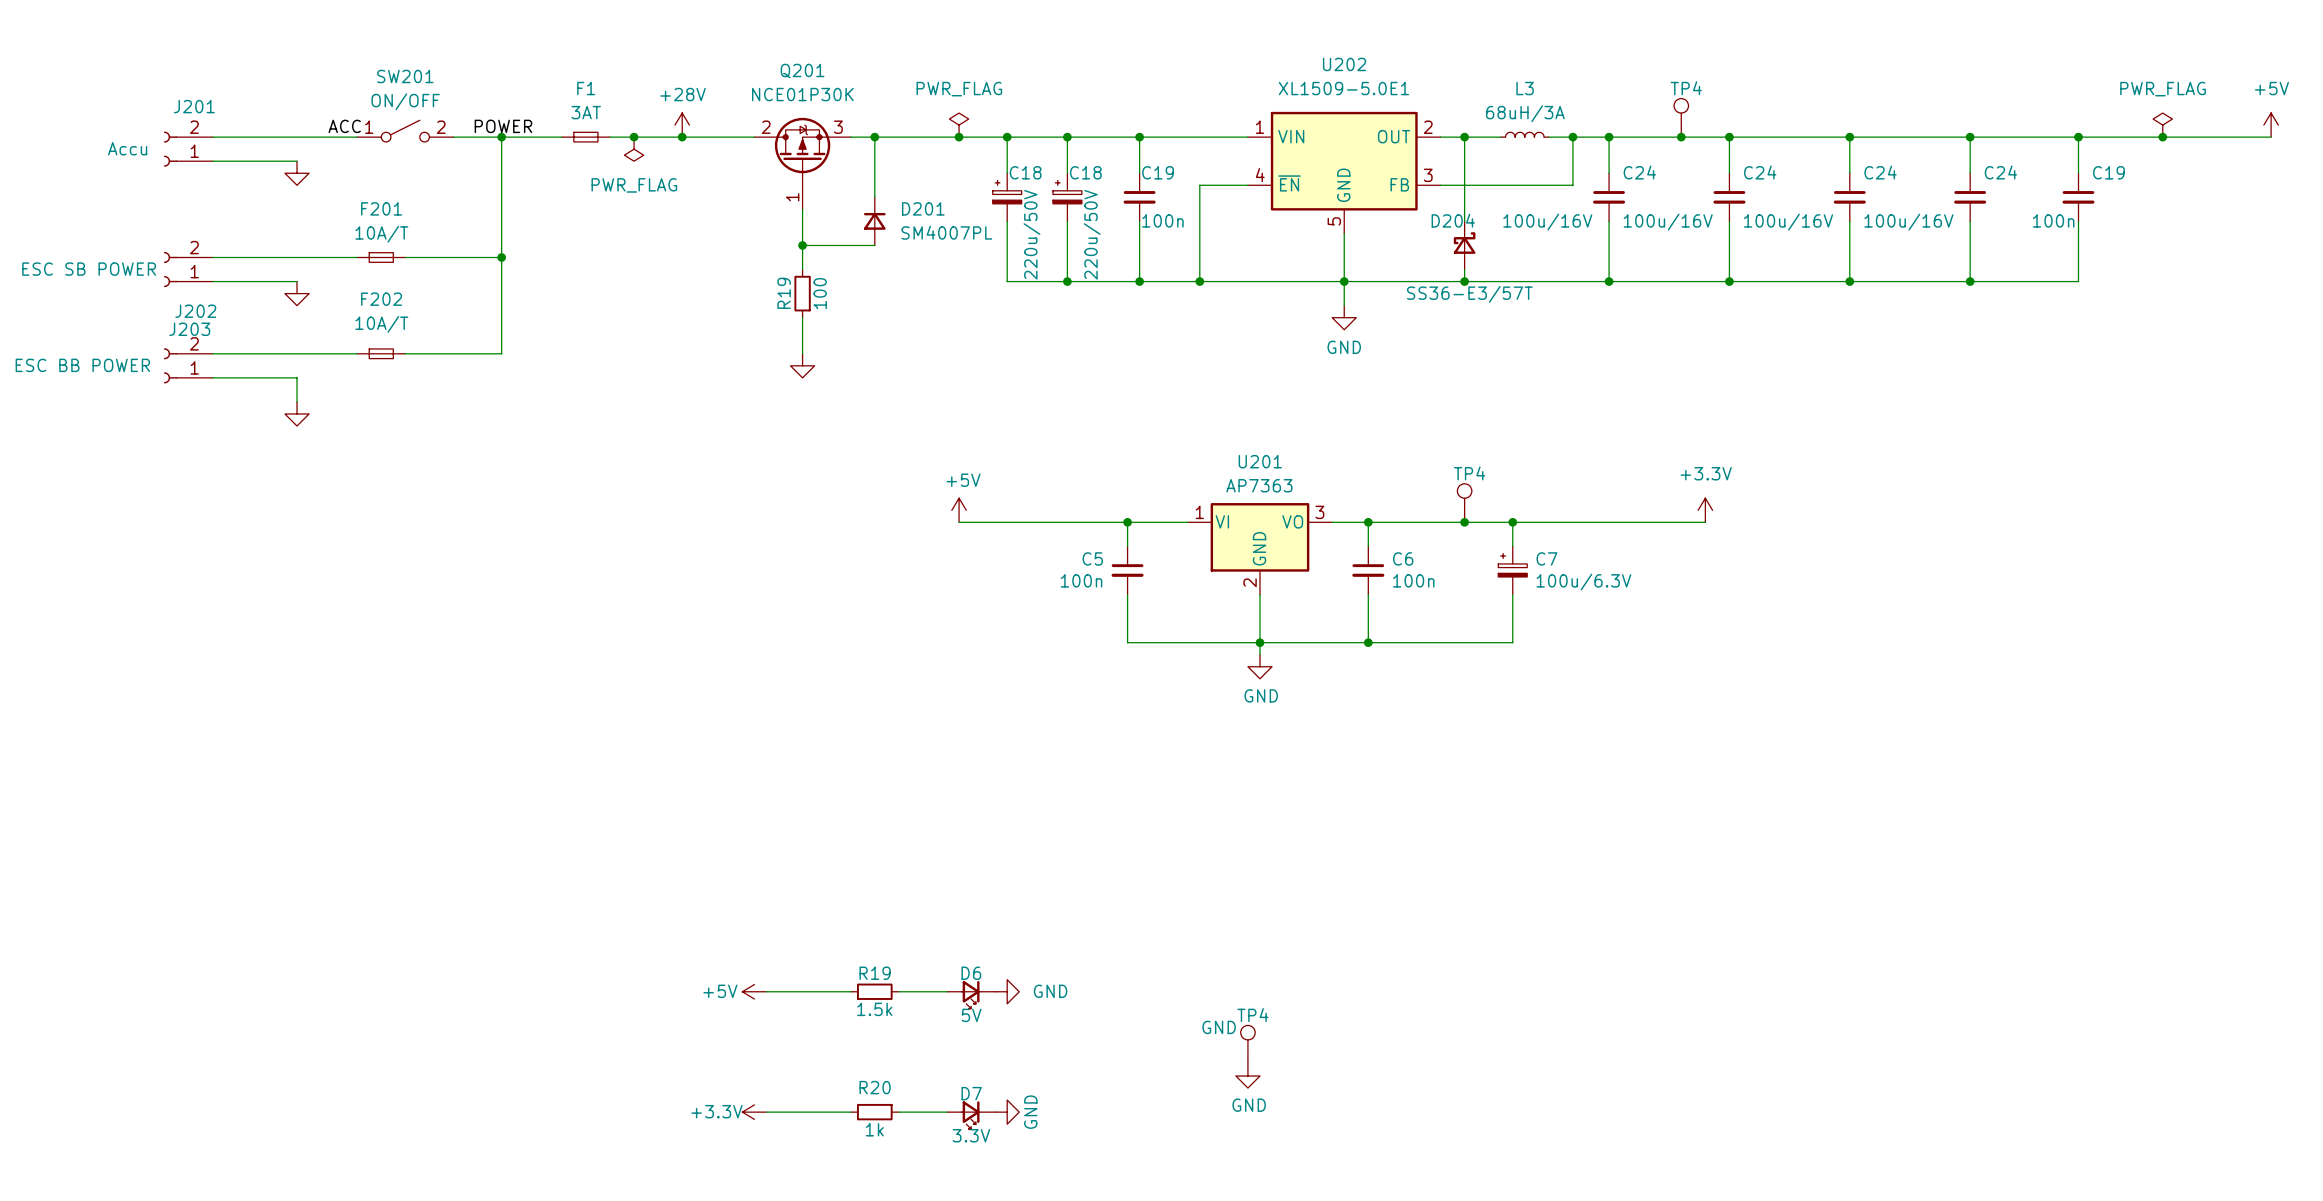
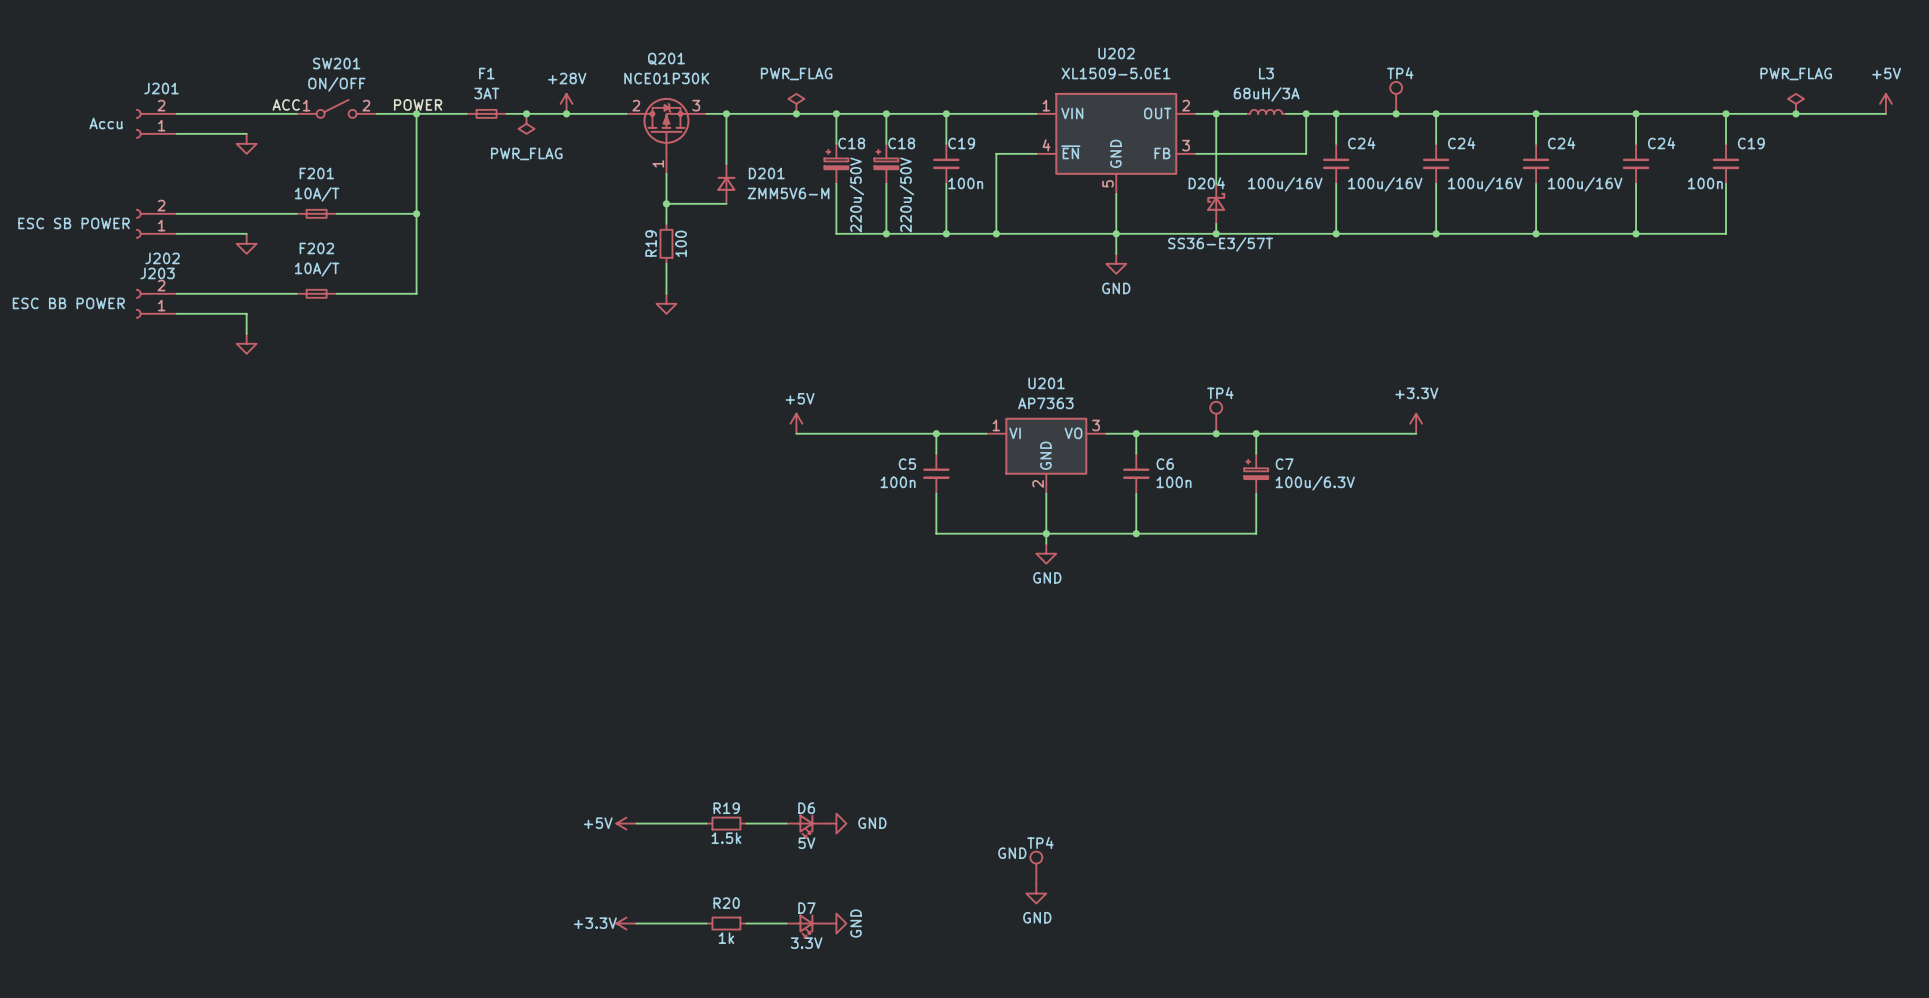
D201 value: SM4007PL (946, 232) -> ZMM5V6-M (788, 193)

